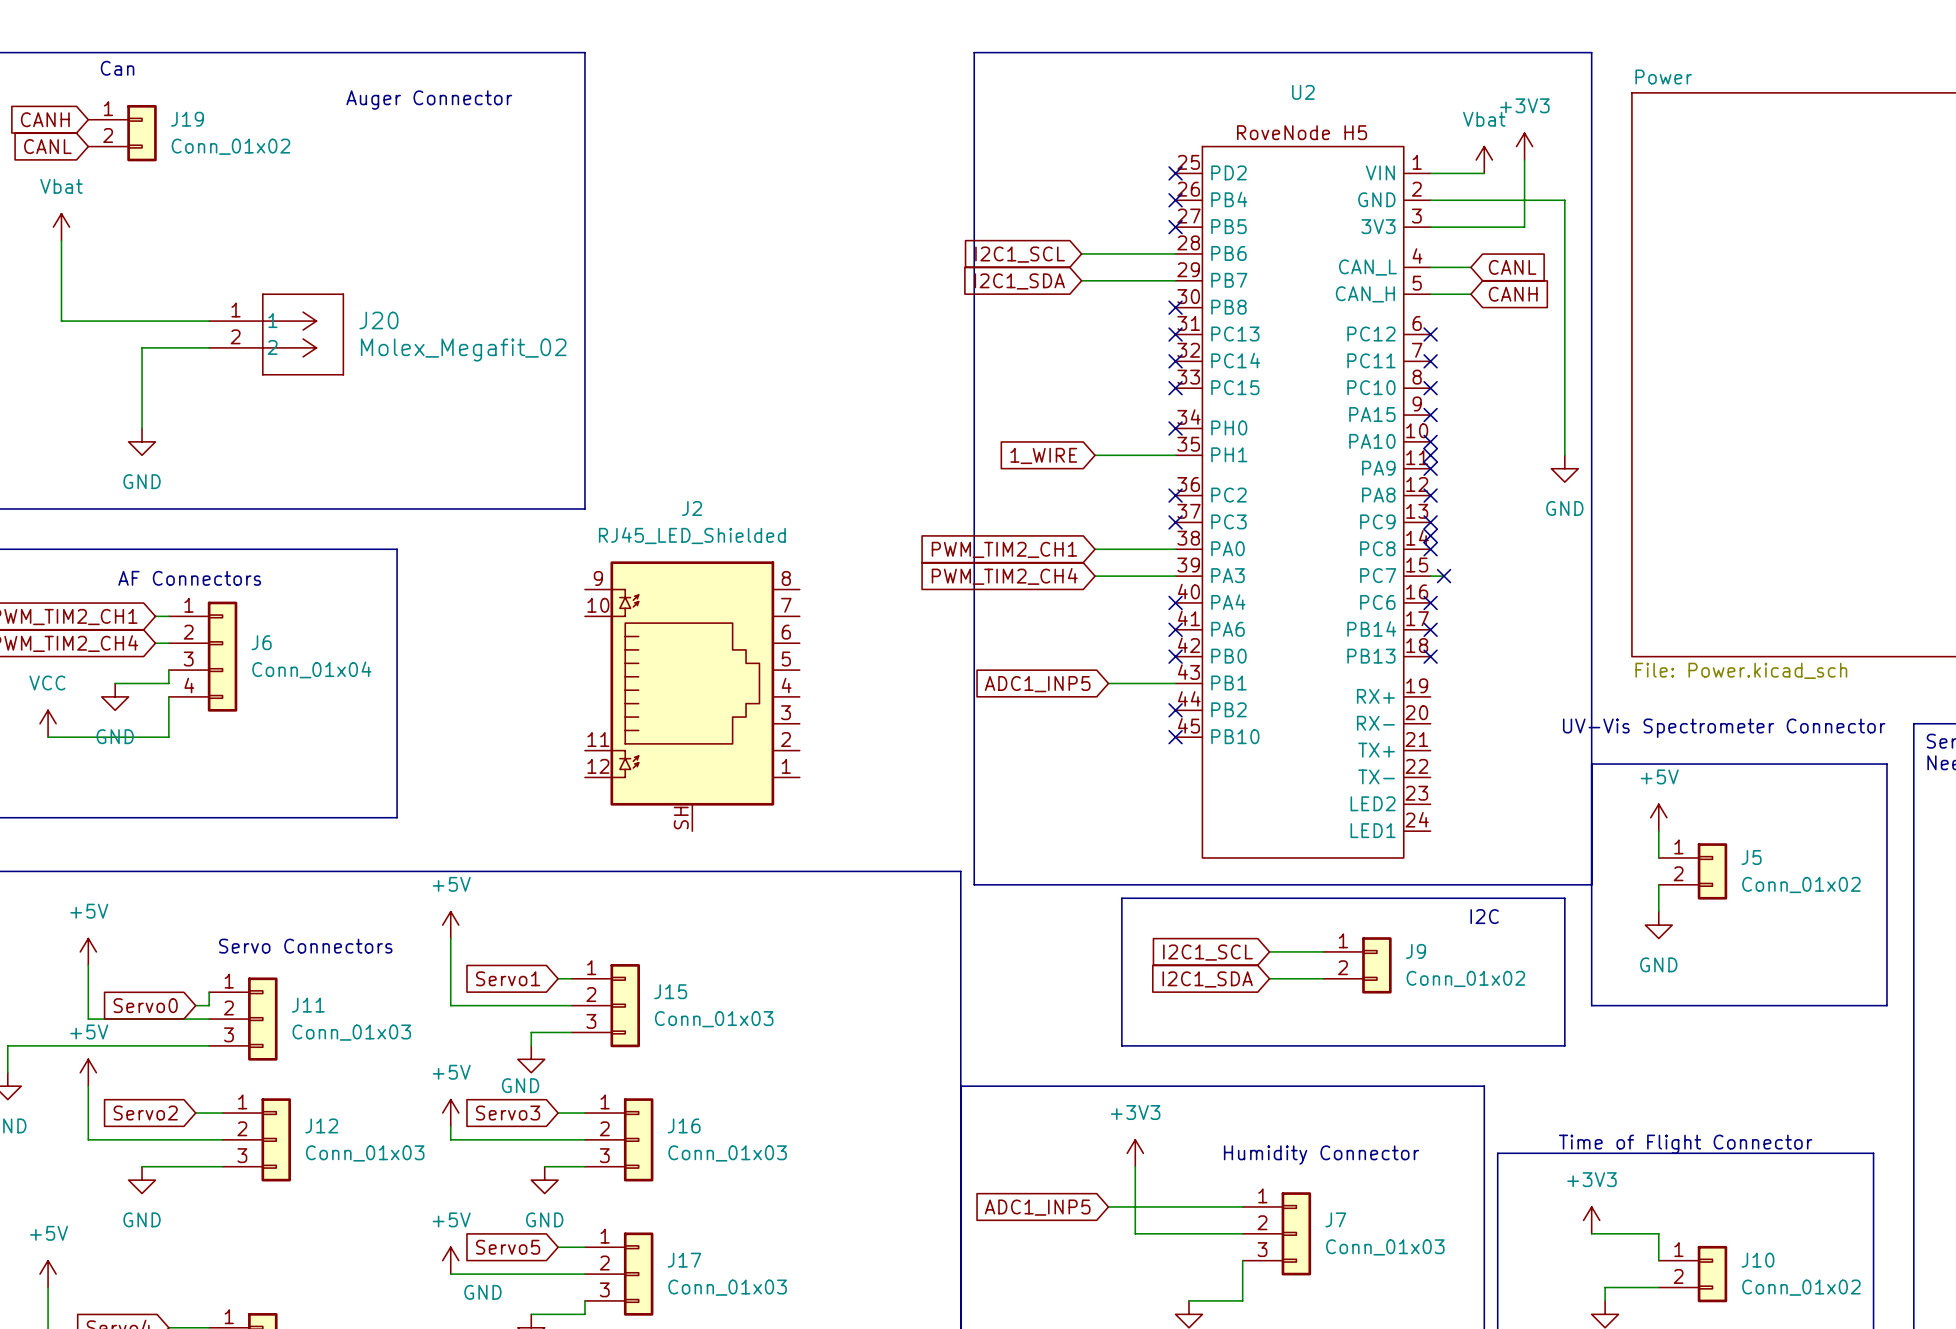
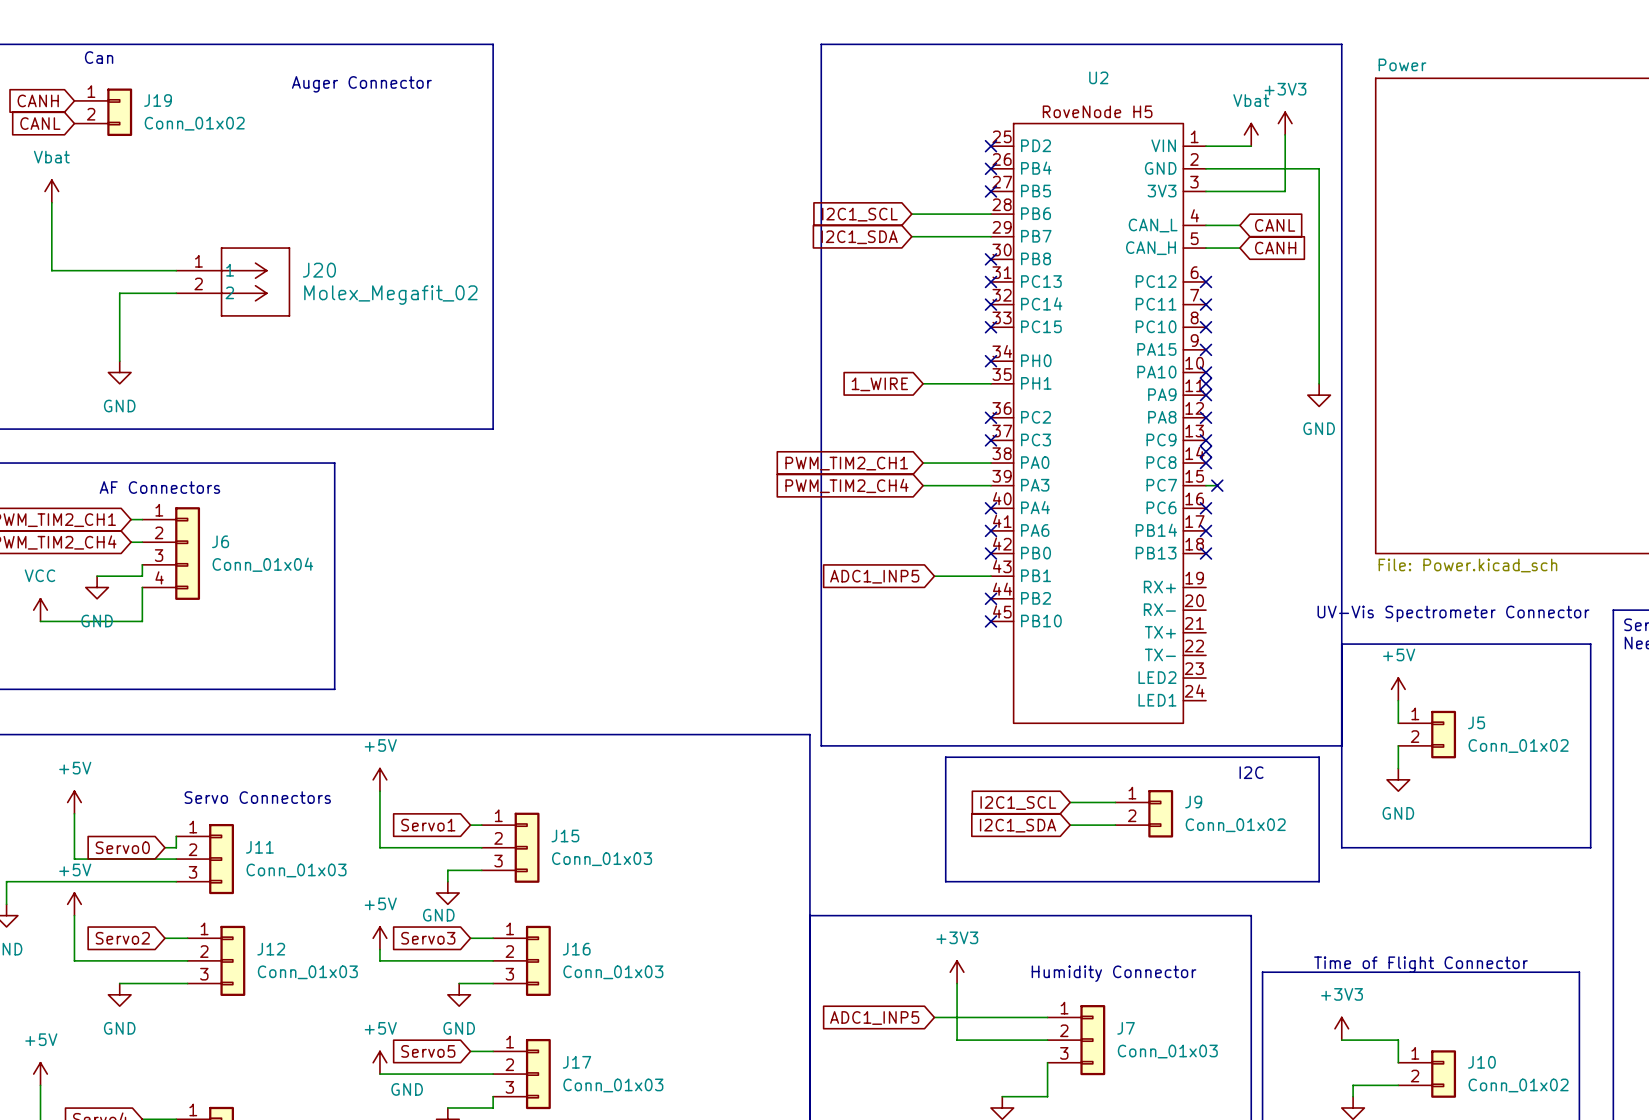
J2: RJ45_LED_Shielded (692, 696) -> none

